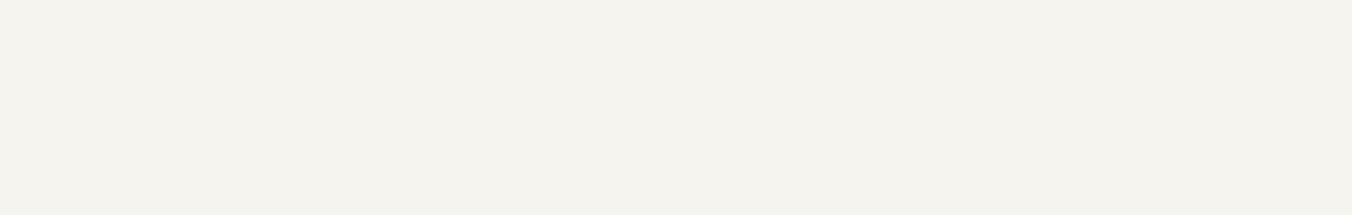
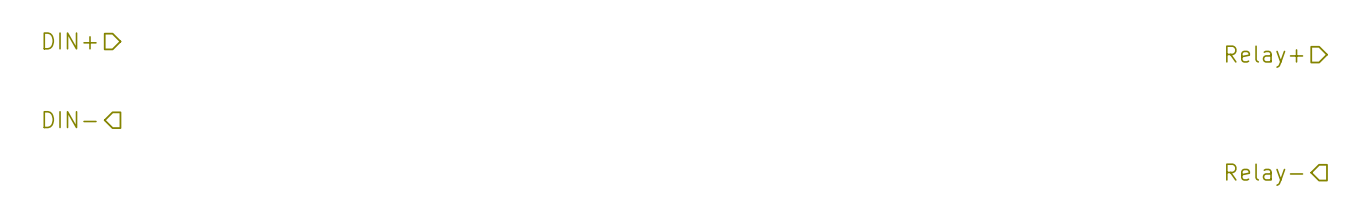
hierarchical label: none -> DIN+ (70, 40)
hierarchical label: none -> Relay+ (1264, 56)
hierarchical label: none -> DIN- (70, 119)
hierarchical label: none -> Relay- (1264, 174)

